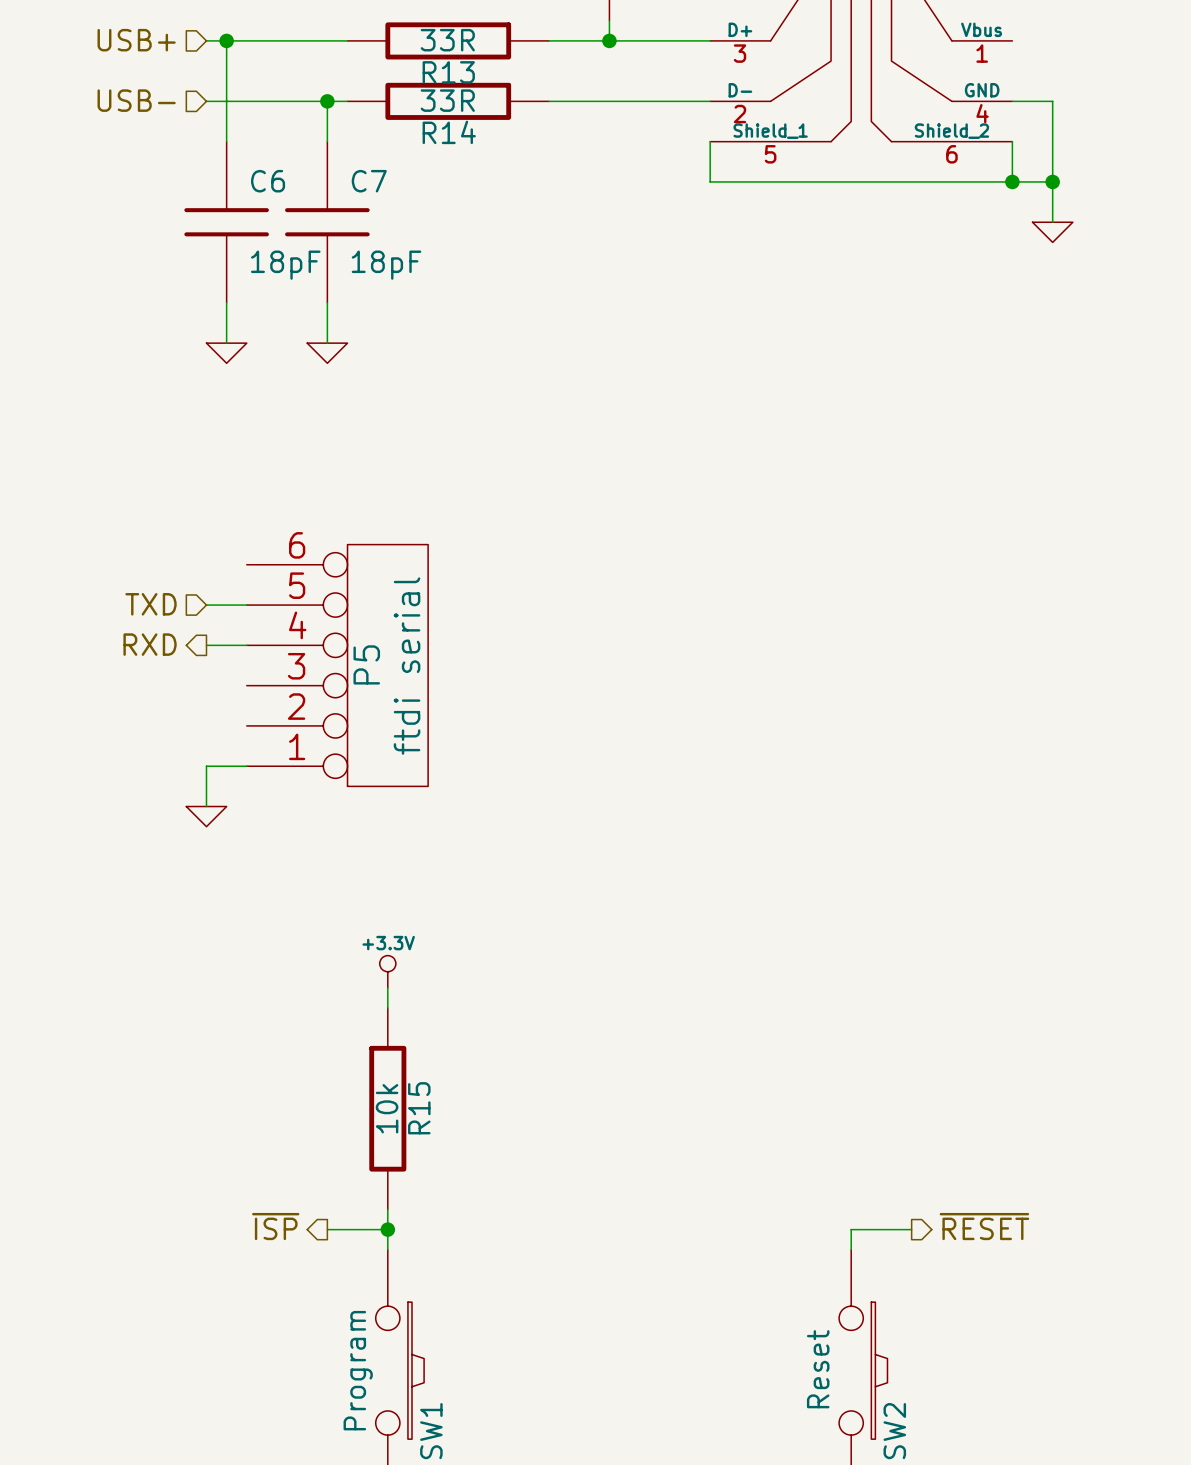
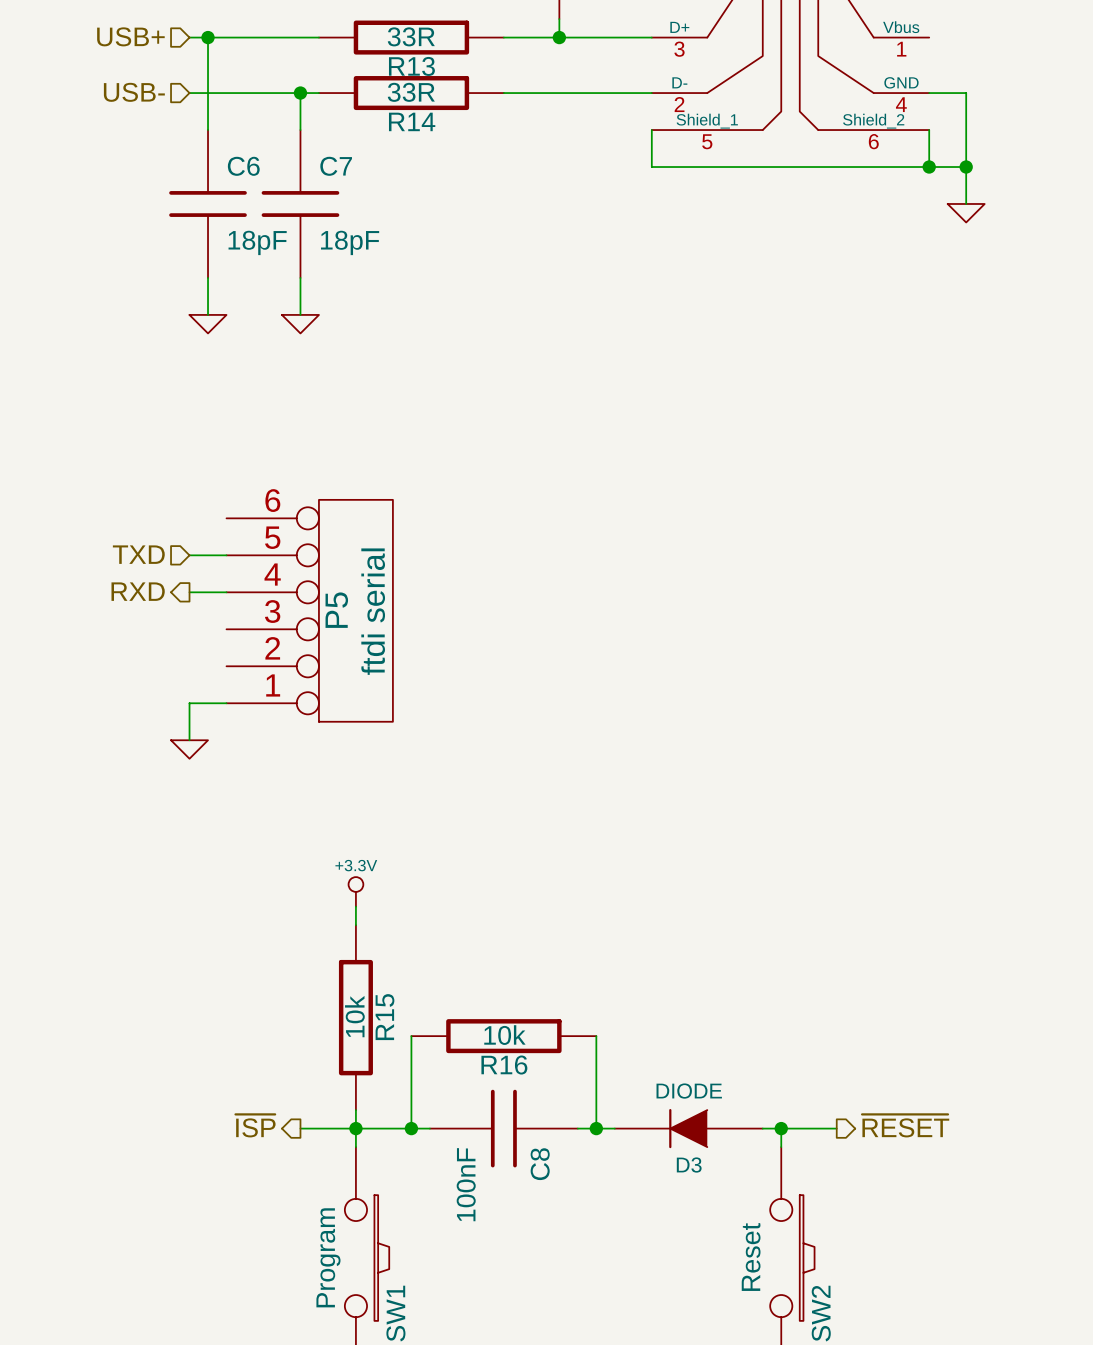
wire: none -> (411, 1036) (411, 1128)
R16: none -> 10k (503, 1036)
wire: none -> (596, 1036) (596, 1128)
wire: none -> (355, 1128) (429, 1128)
junction: none -> (411, 1128)
C8: none -> 100nF (503, 1128)
wire: none -> (577, 1128) (614, 1128)
junction: none -> (596, 1128)
D3: none -> DIODE (688, 1128)
wire: none -> (762, 1128) (781, 1128)
junction: none -> (781, 1128)

